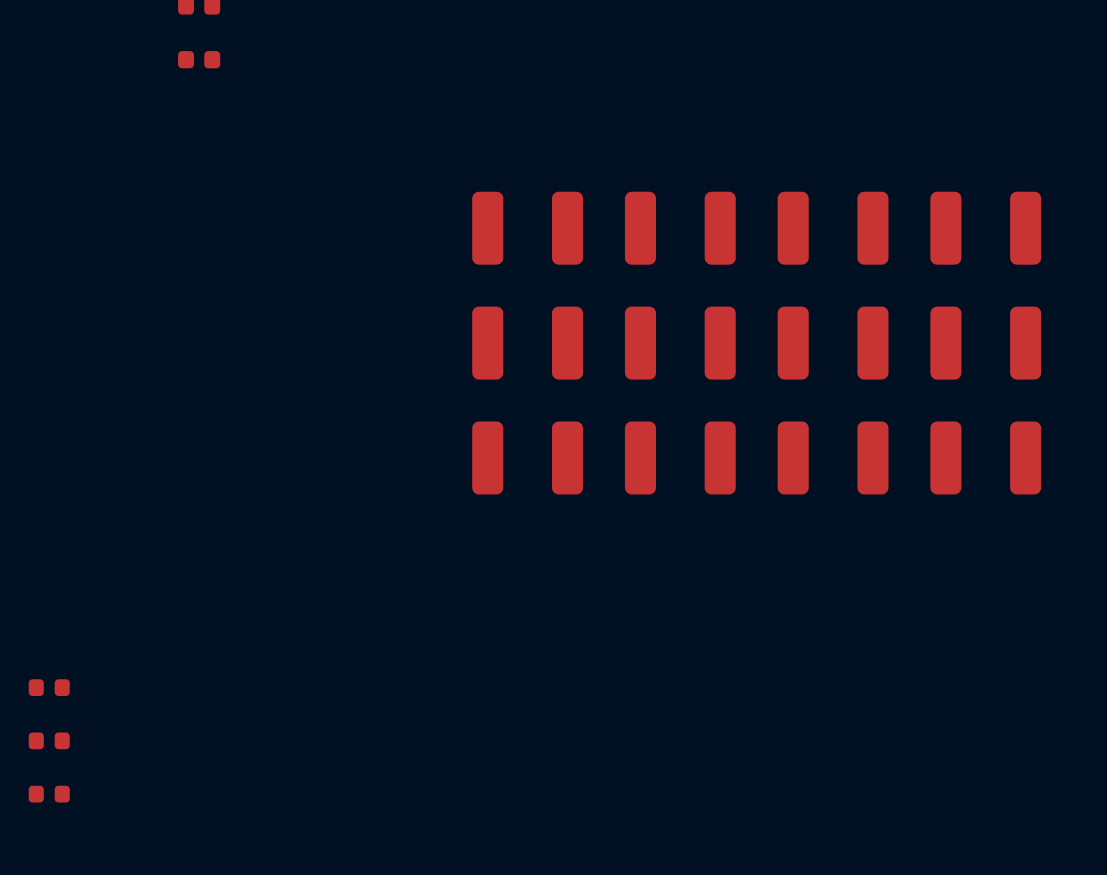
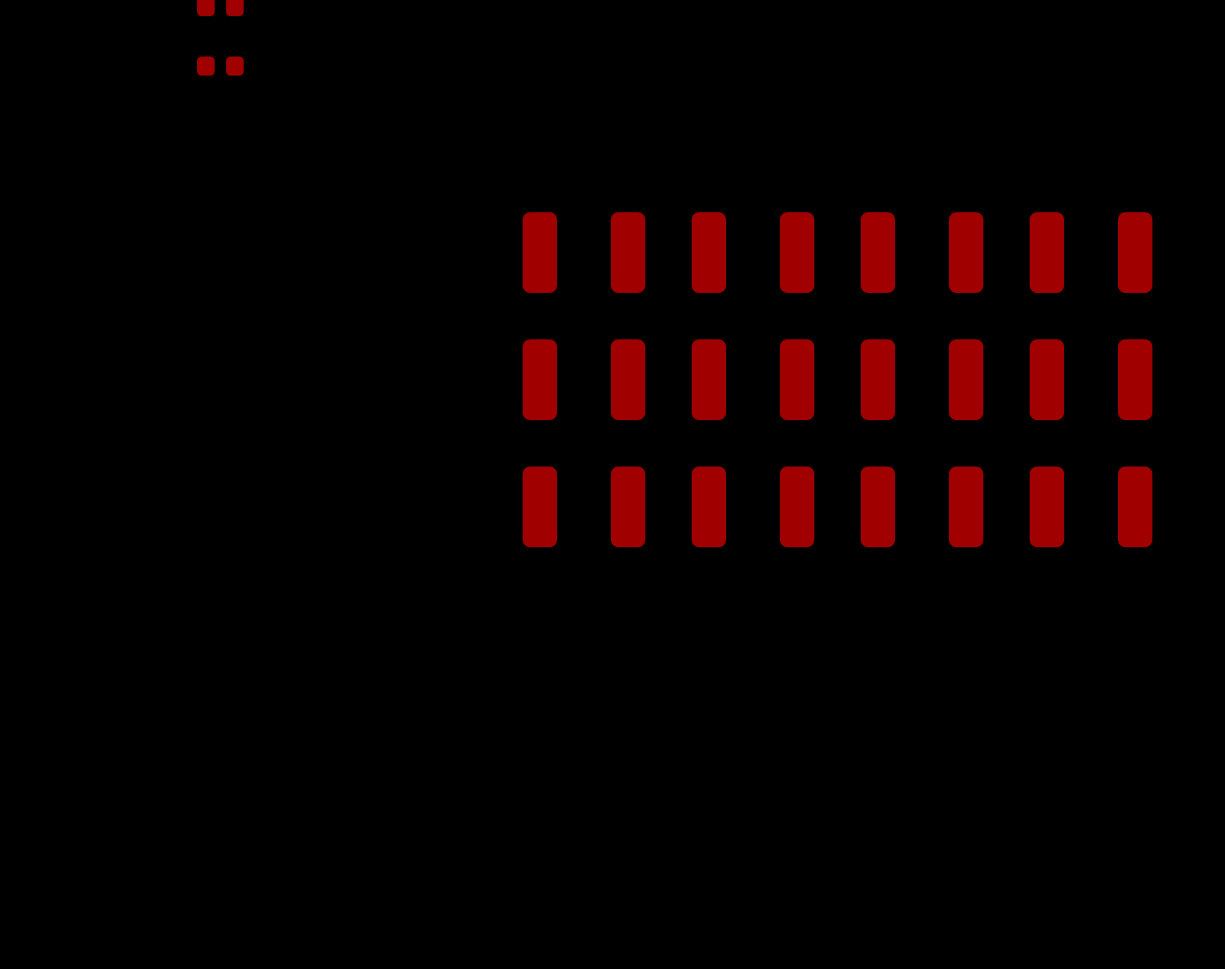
part: (49, 687) -> none
part: (49, 740) -> none
part: (49, 794) -> none

